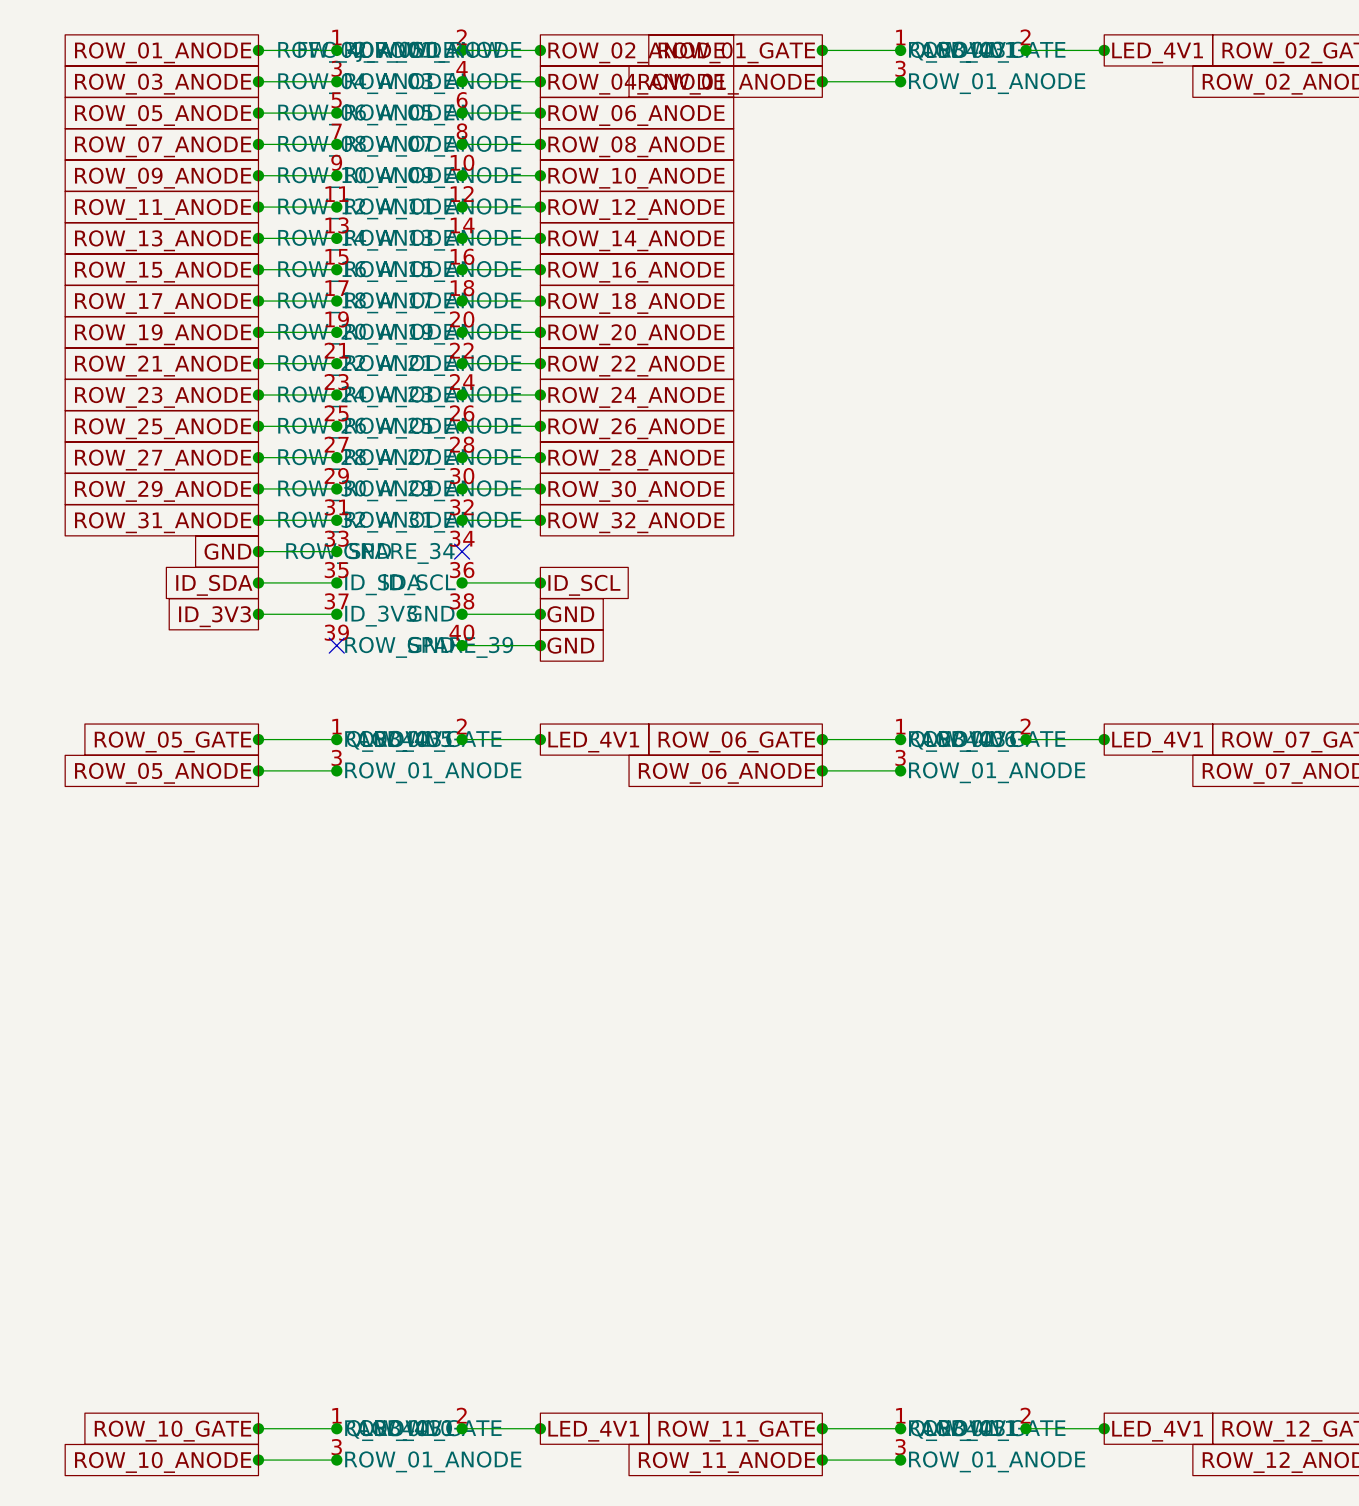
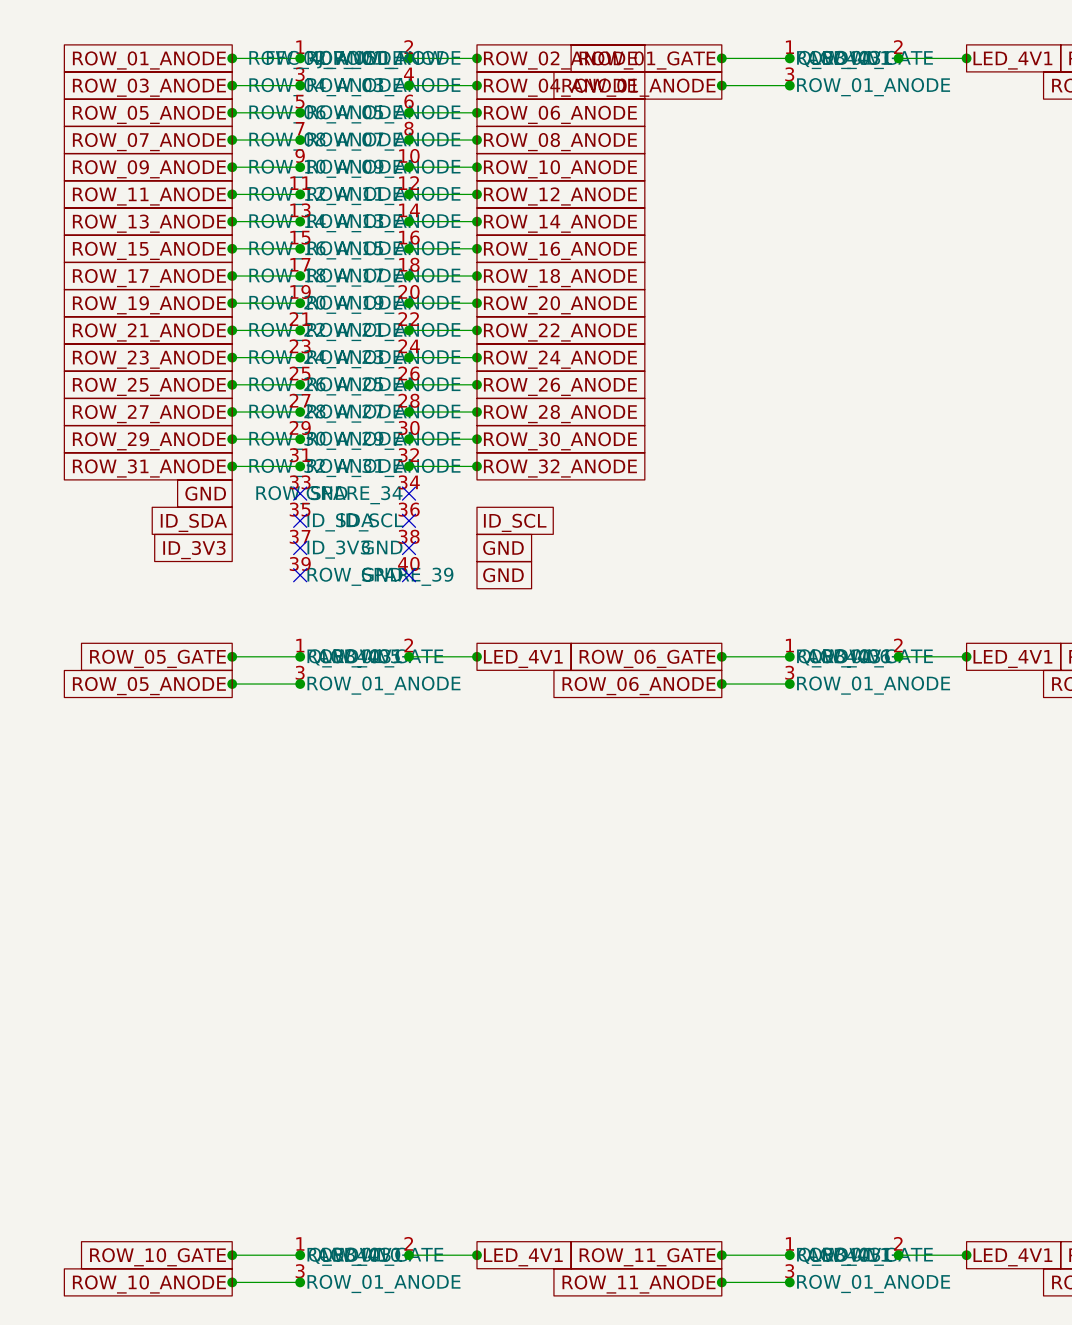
wire: (258, 551) (336, 551) -> none
junction: (258, 551) -> none
junction: (336, 551) -> none
no-connect mark: none -> (300, 493)
wire: (258, 582) (336, 582) -> none
junction: (258, 582) -> none
junction: (336, 582) -> none
no-connect mark: none -> (300, 520)
wire: (462, 582) (540, 582) -> none
junction: (462, 582) -> none
no-connect mark: none -> (408, 520)
junction: (540, 582) -> none
wire: (258, 614) (336, 614) -> none
junction: (258, 614) -> none
junction: (336, 614) -> none
no-connect mark: none -> (300, 548)
wire: (462, 614) (540, 614) -> none
junction: (462, 614) -> none
no-connect mark: none -> (408, 548)
junction: (540, 614) -> none
wire: (462, 645) (540, 645) -> none
junction: (462, 645) -> none
no-connect mark: none -> (408, 575)
junction: (540, 645) -> none

